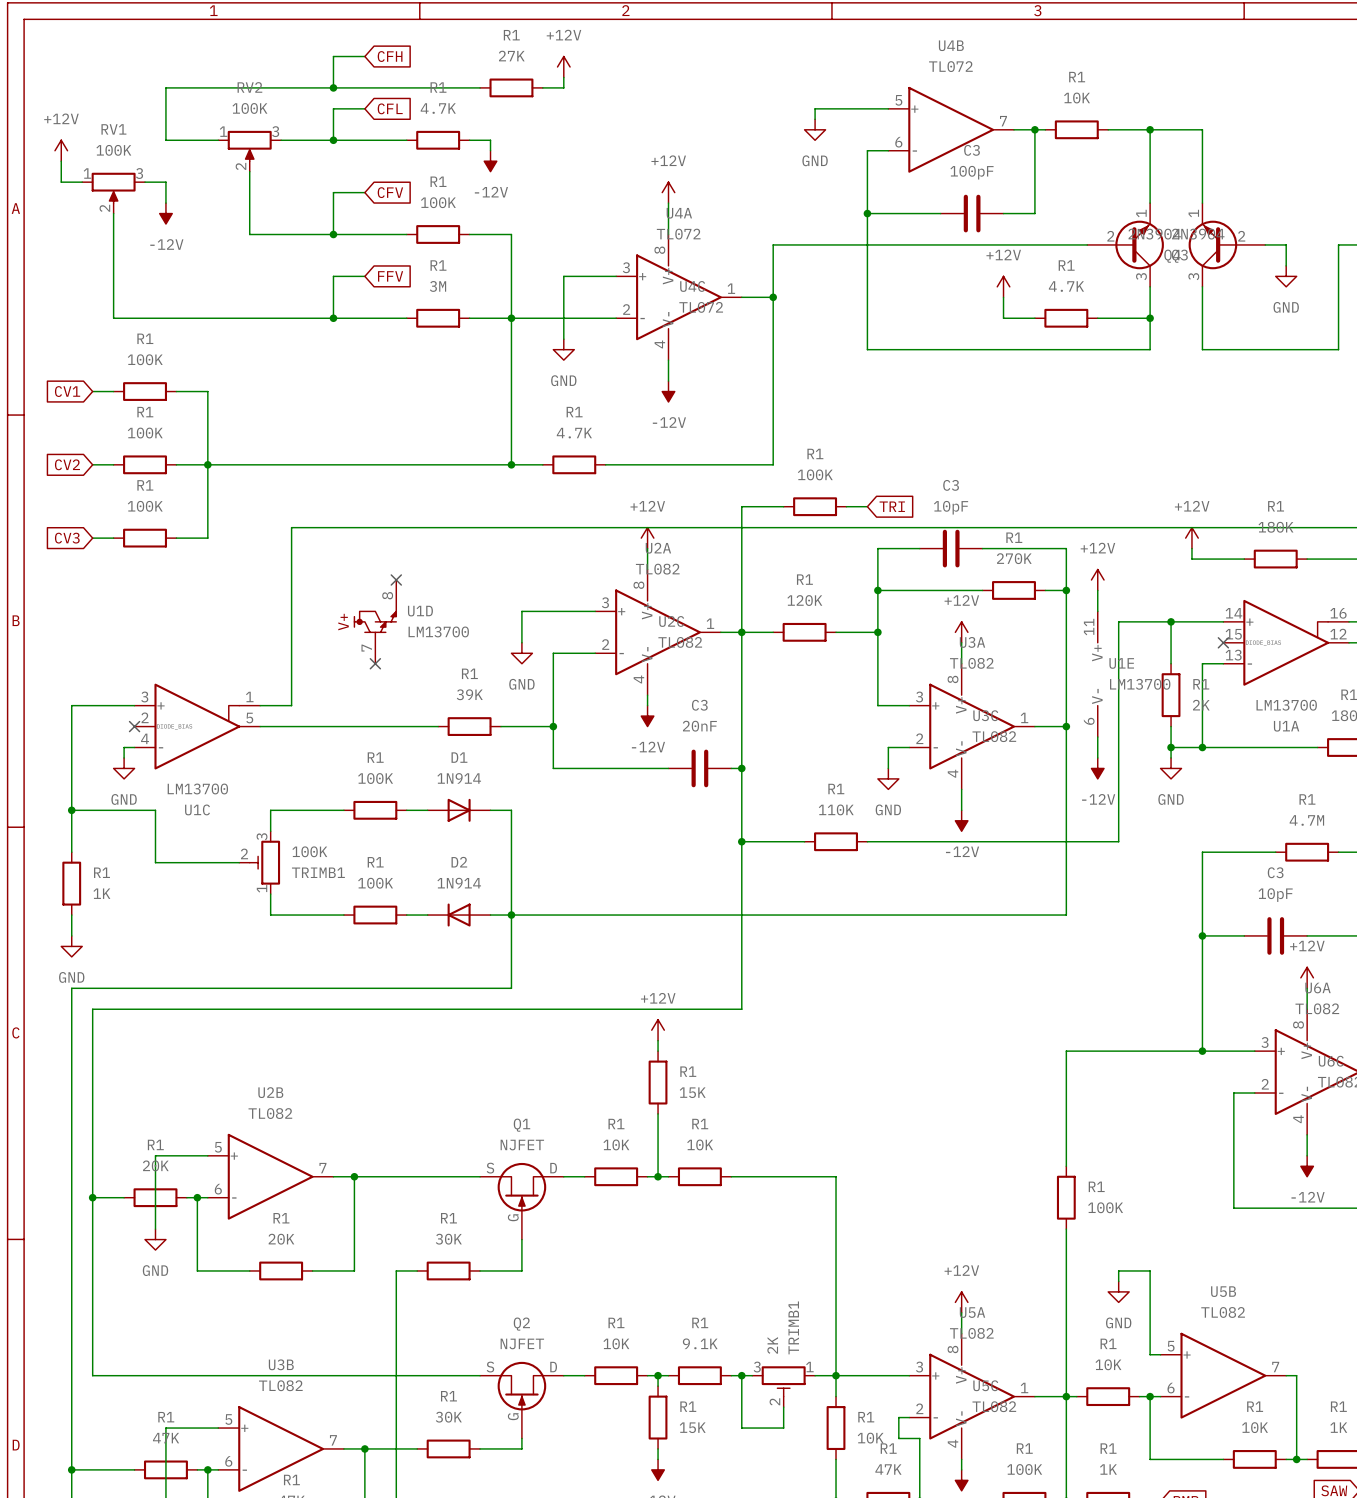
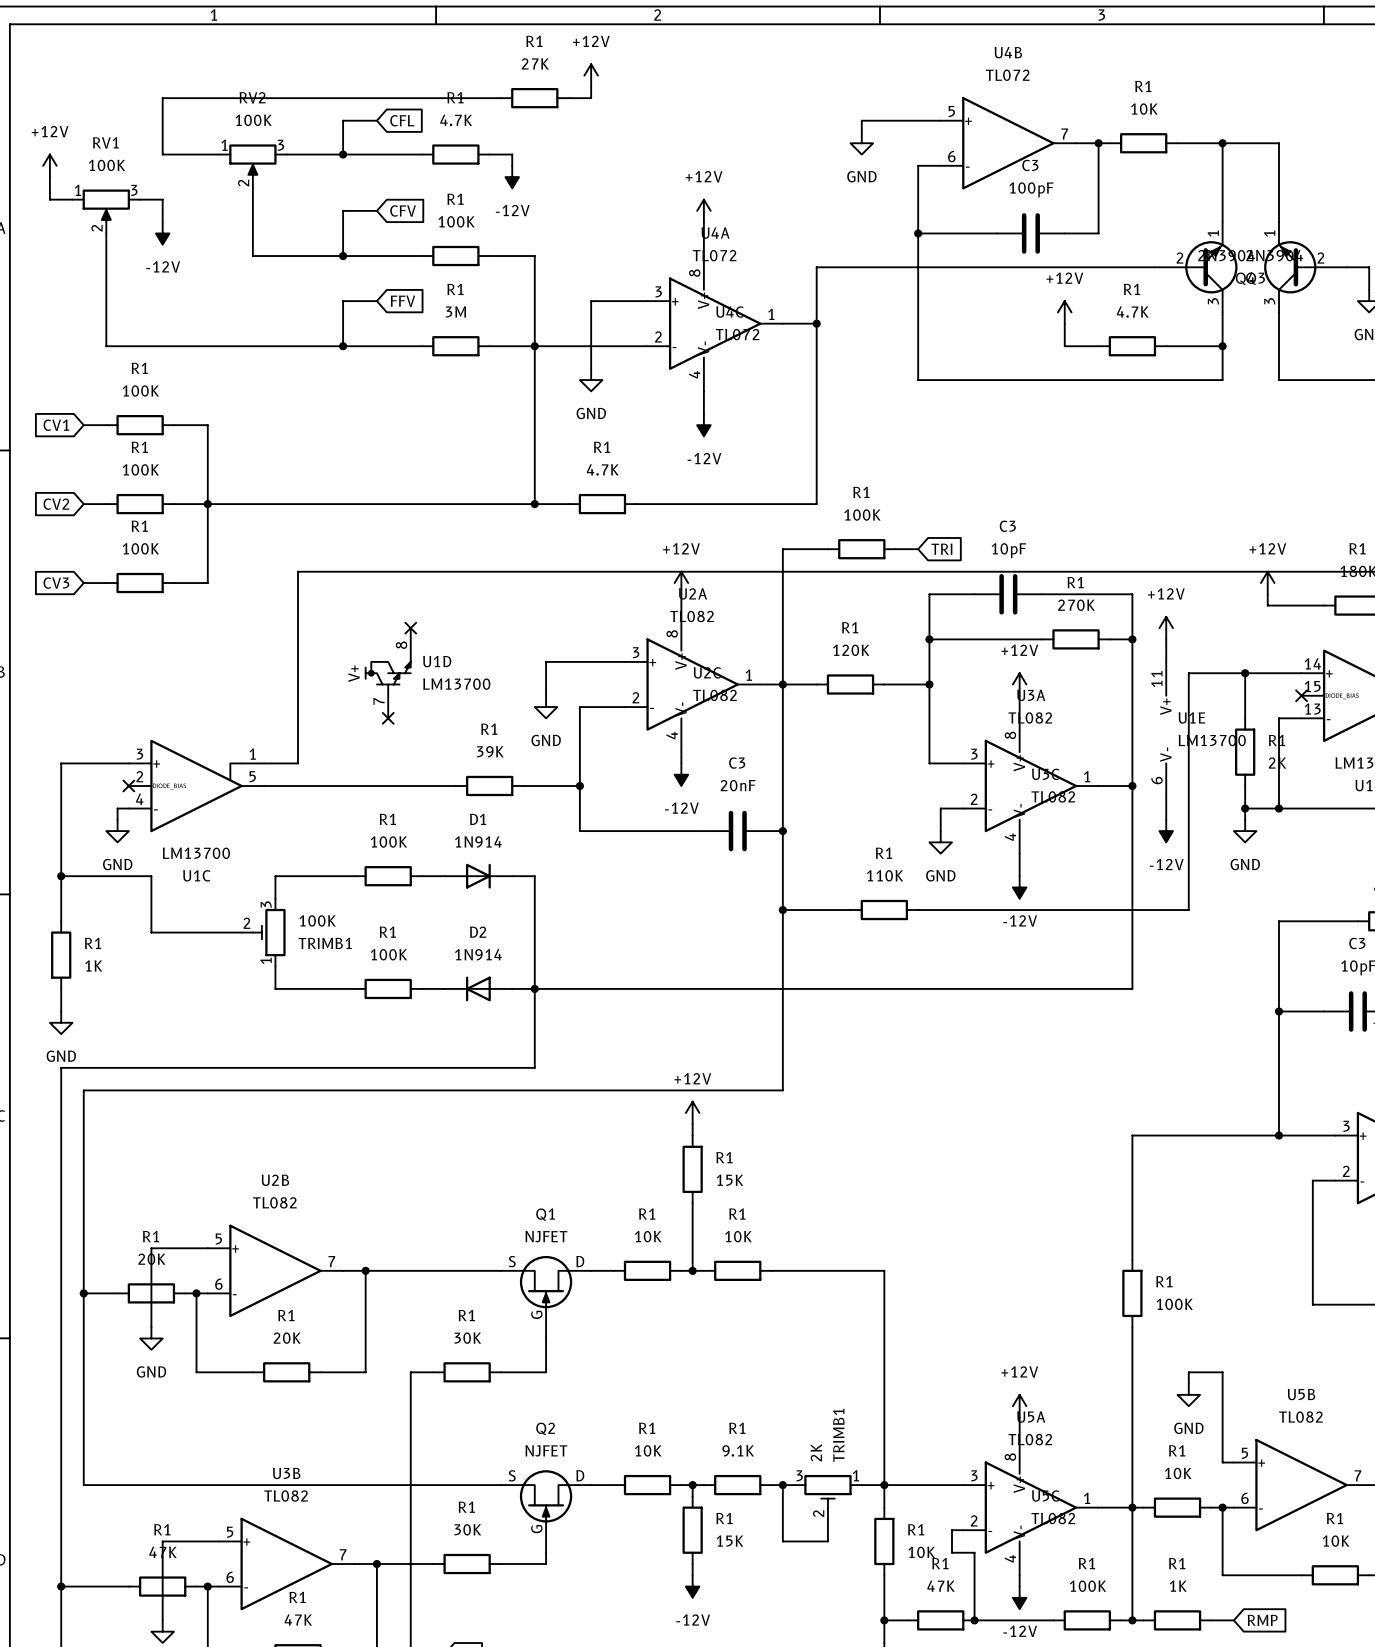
wire: (364, 56) (333, 56) (333, 87) -> none
global label: CFH (390, 56) -> none
junction: (333, 87) -> none

